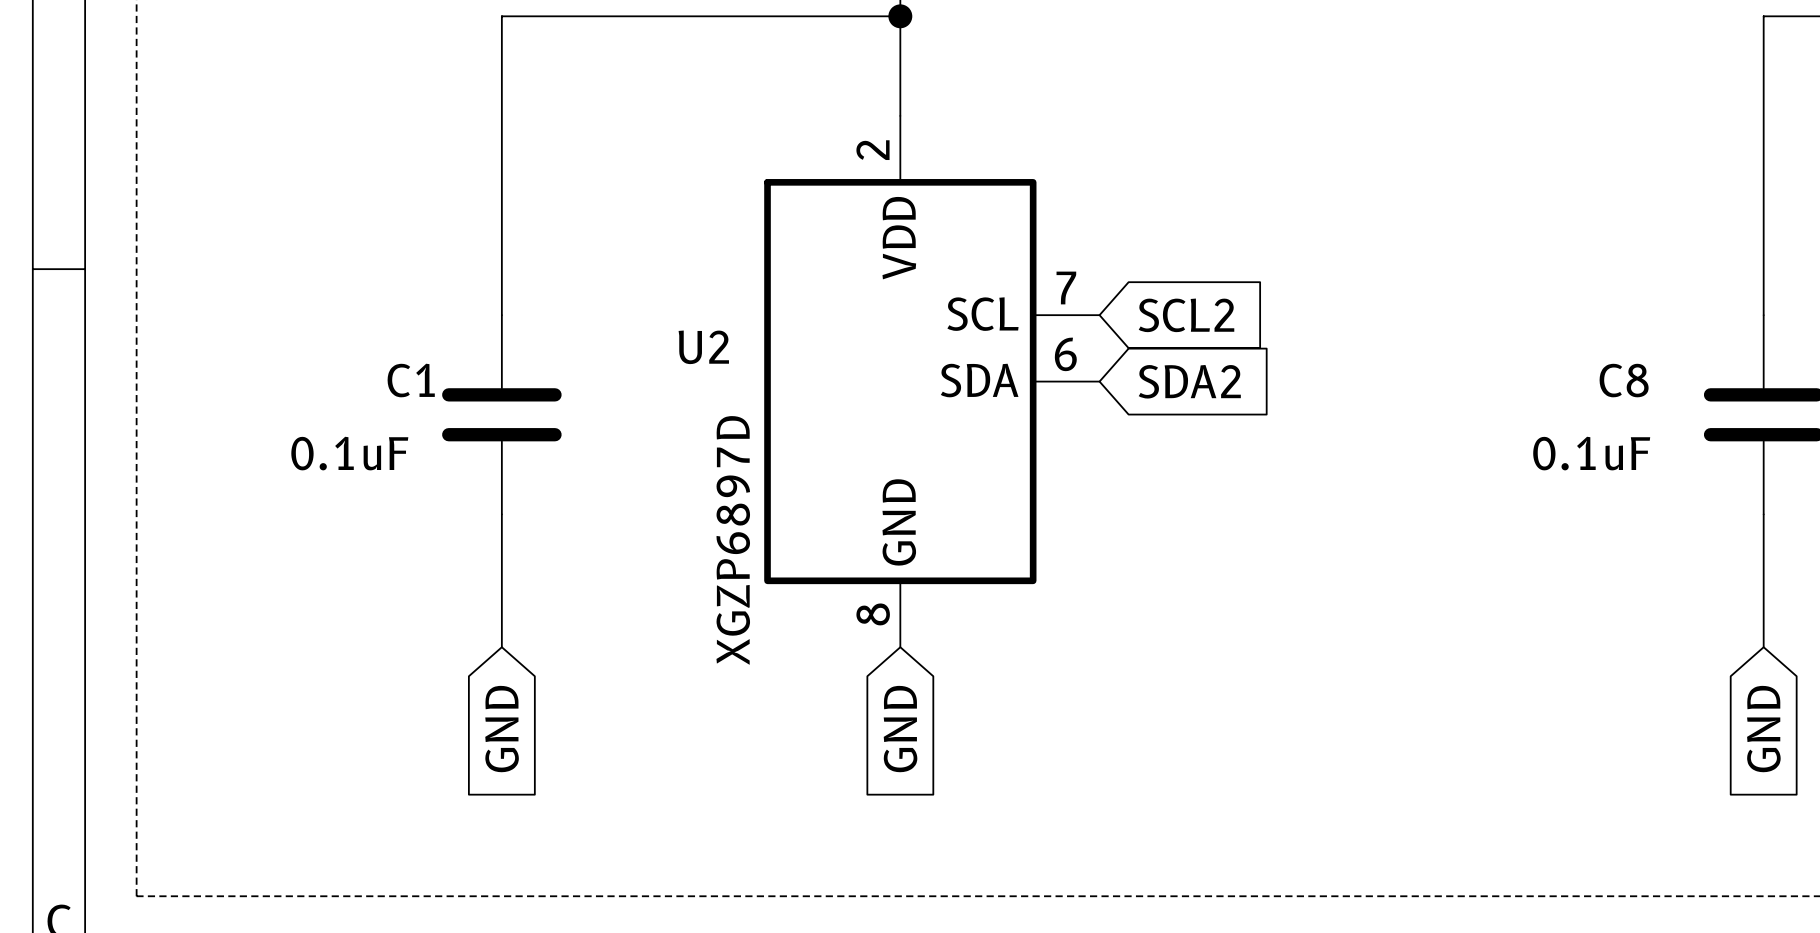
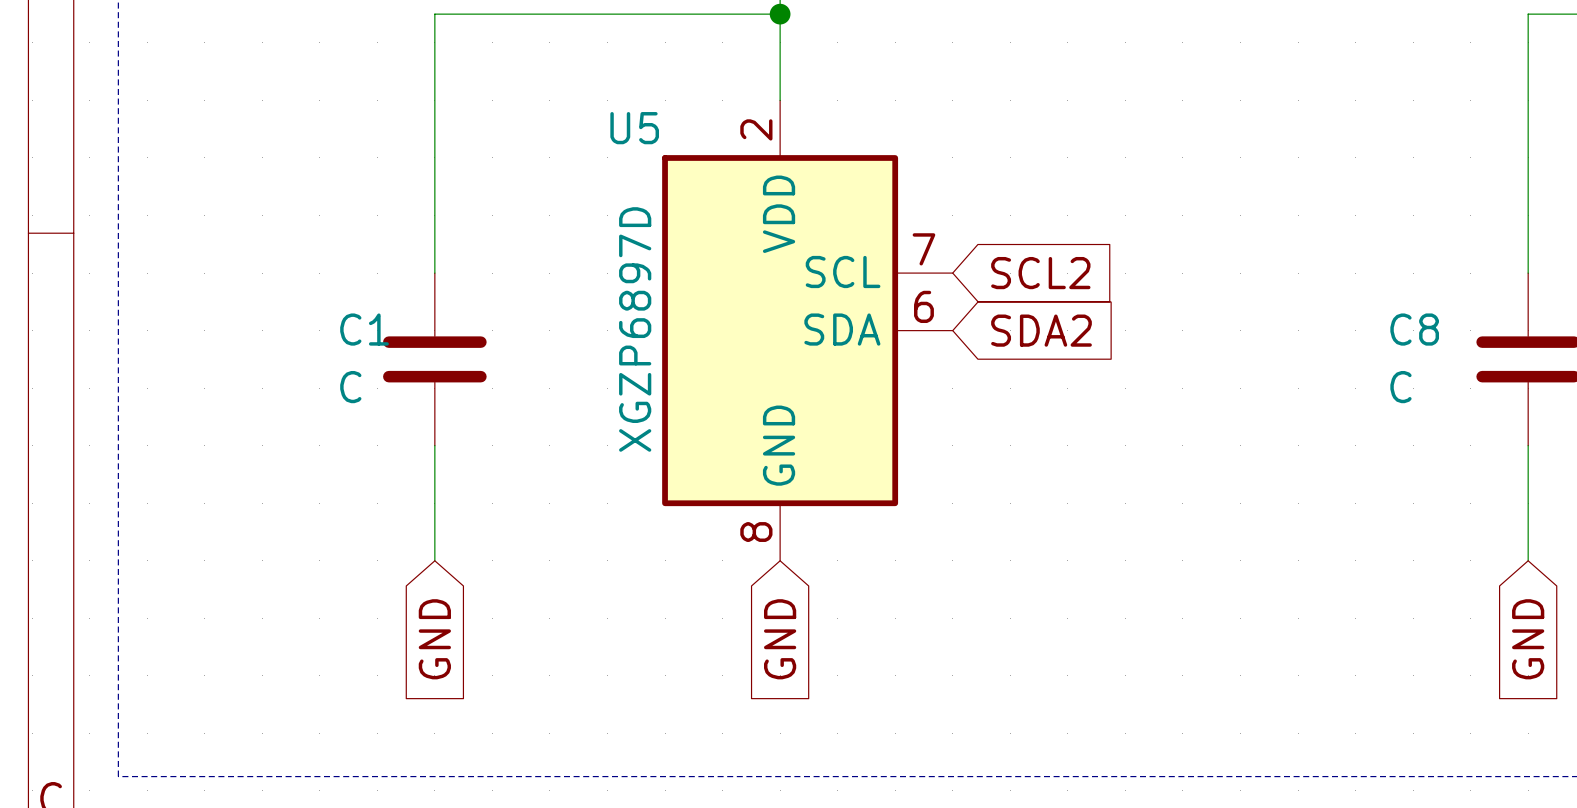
U2 name: U2 (703, 347) -> U5 (634, 128)
C1 value: 0.1uF (349, 453) -> C (350, 387)
C8 value: 0.1uF (1591, 453) -> C (1400, 387)
U2 value position: XGZP6897D (733, 540) -> XGZP6897D (635, 329)

